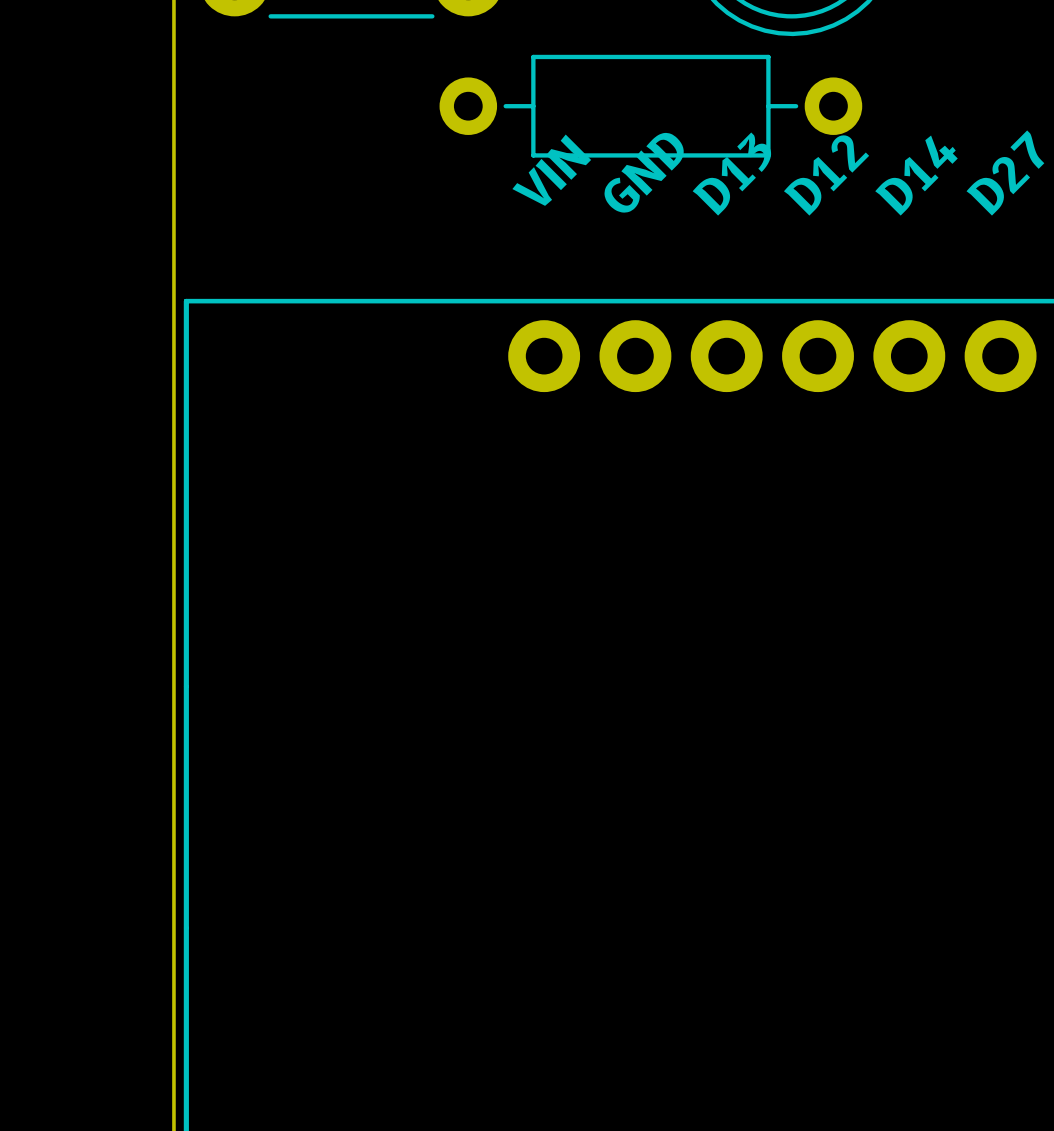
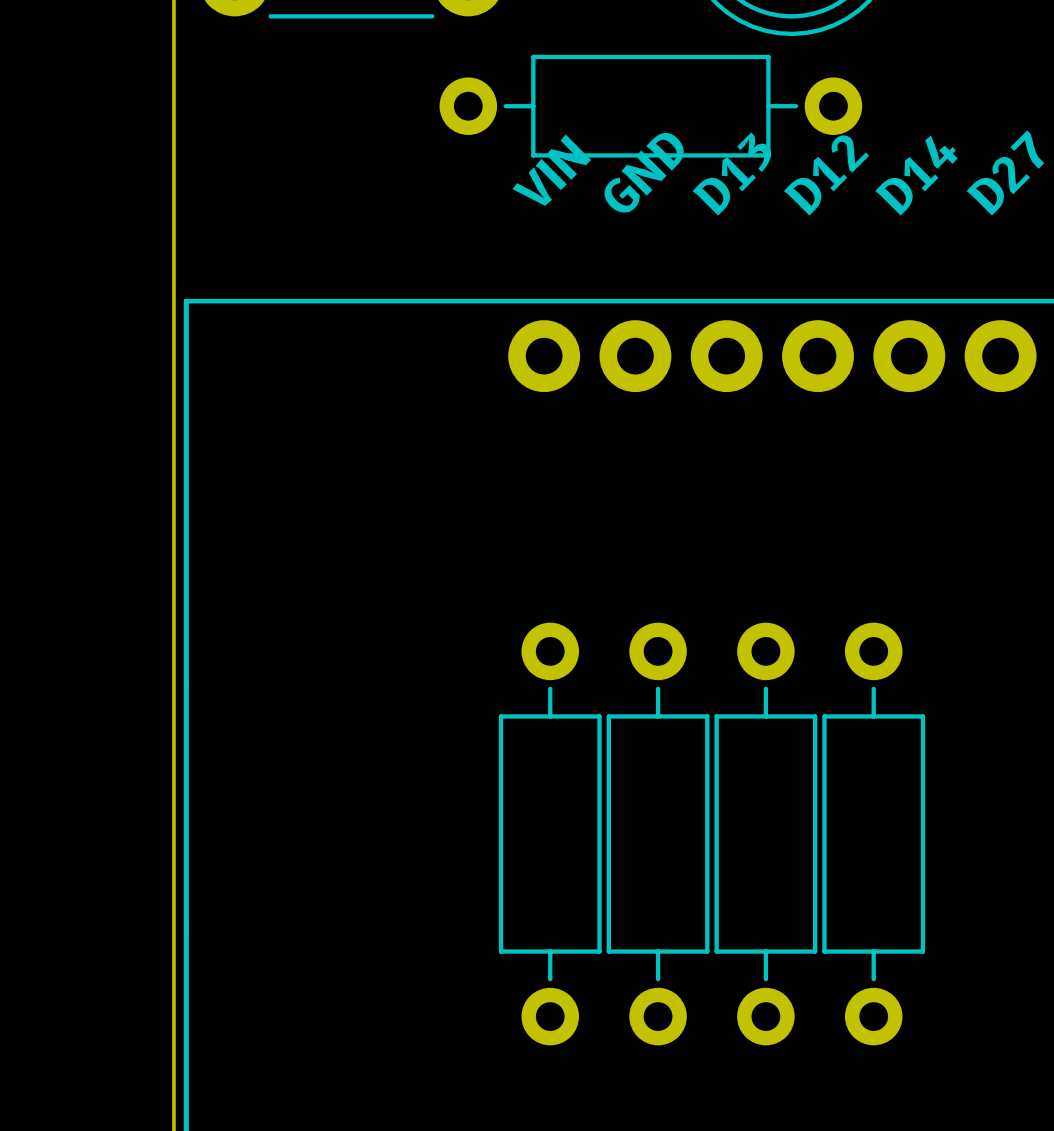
part: none -> (550, 833)
part: none -> (658, 833)
part: none -> (765, 833)
part: none -> (873, 833)

